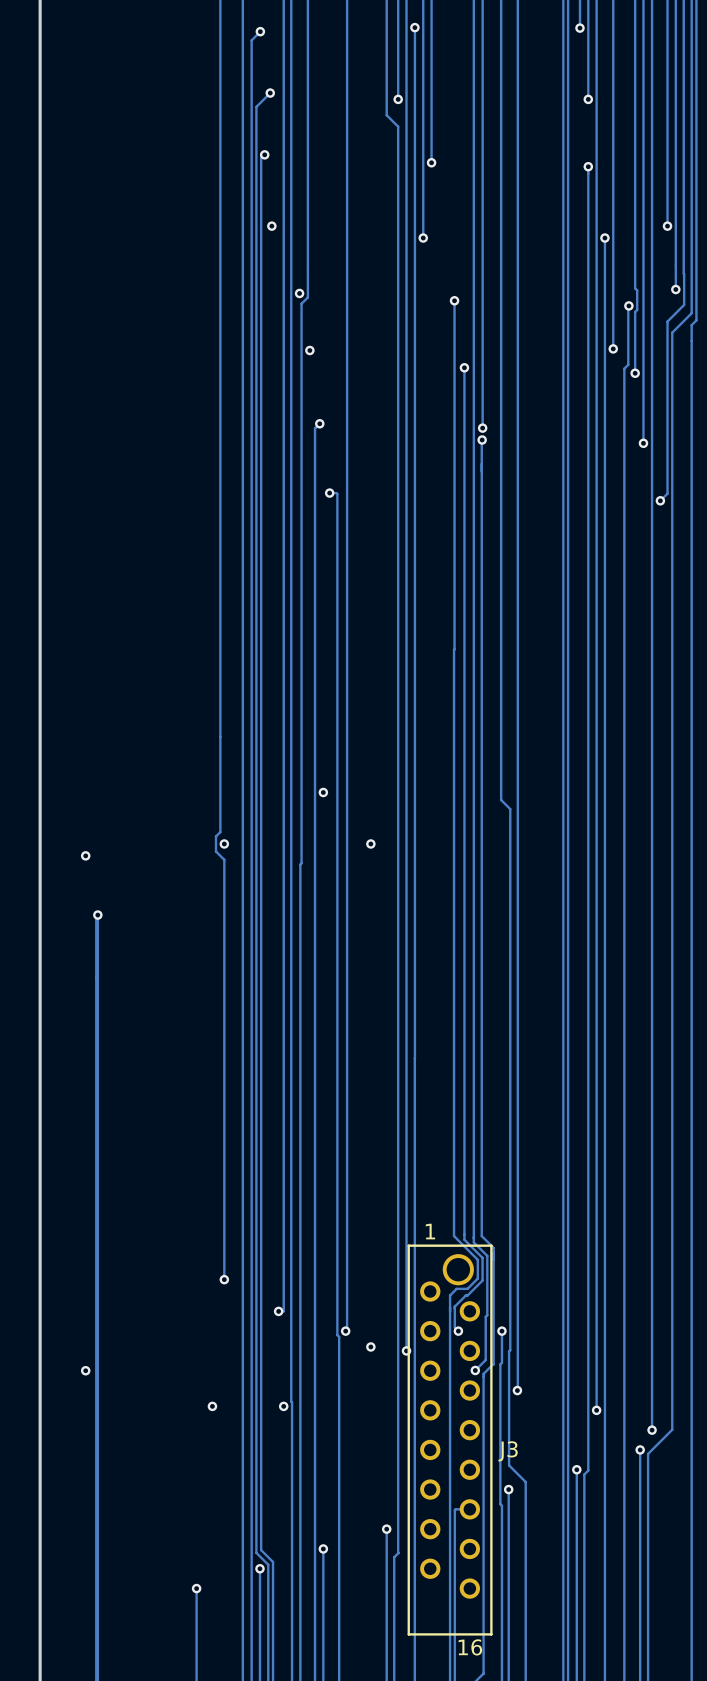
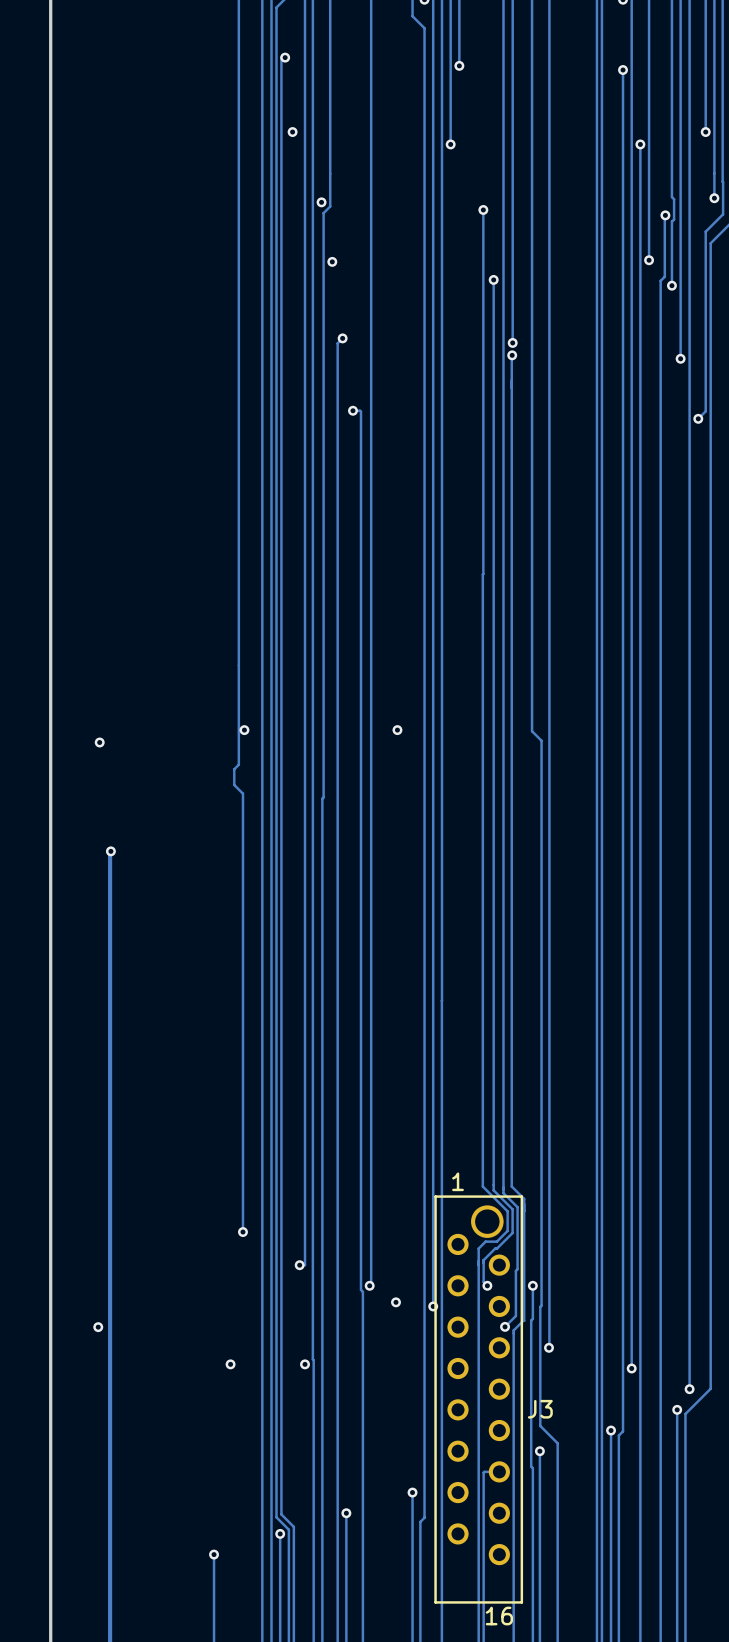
via: (323, 792) -> none
via: none -> (397, 730)
via position: (224, 843) -> (244, 730)
via: (370, 843) -> none
via position: (85, 855) -> (99, 742)

